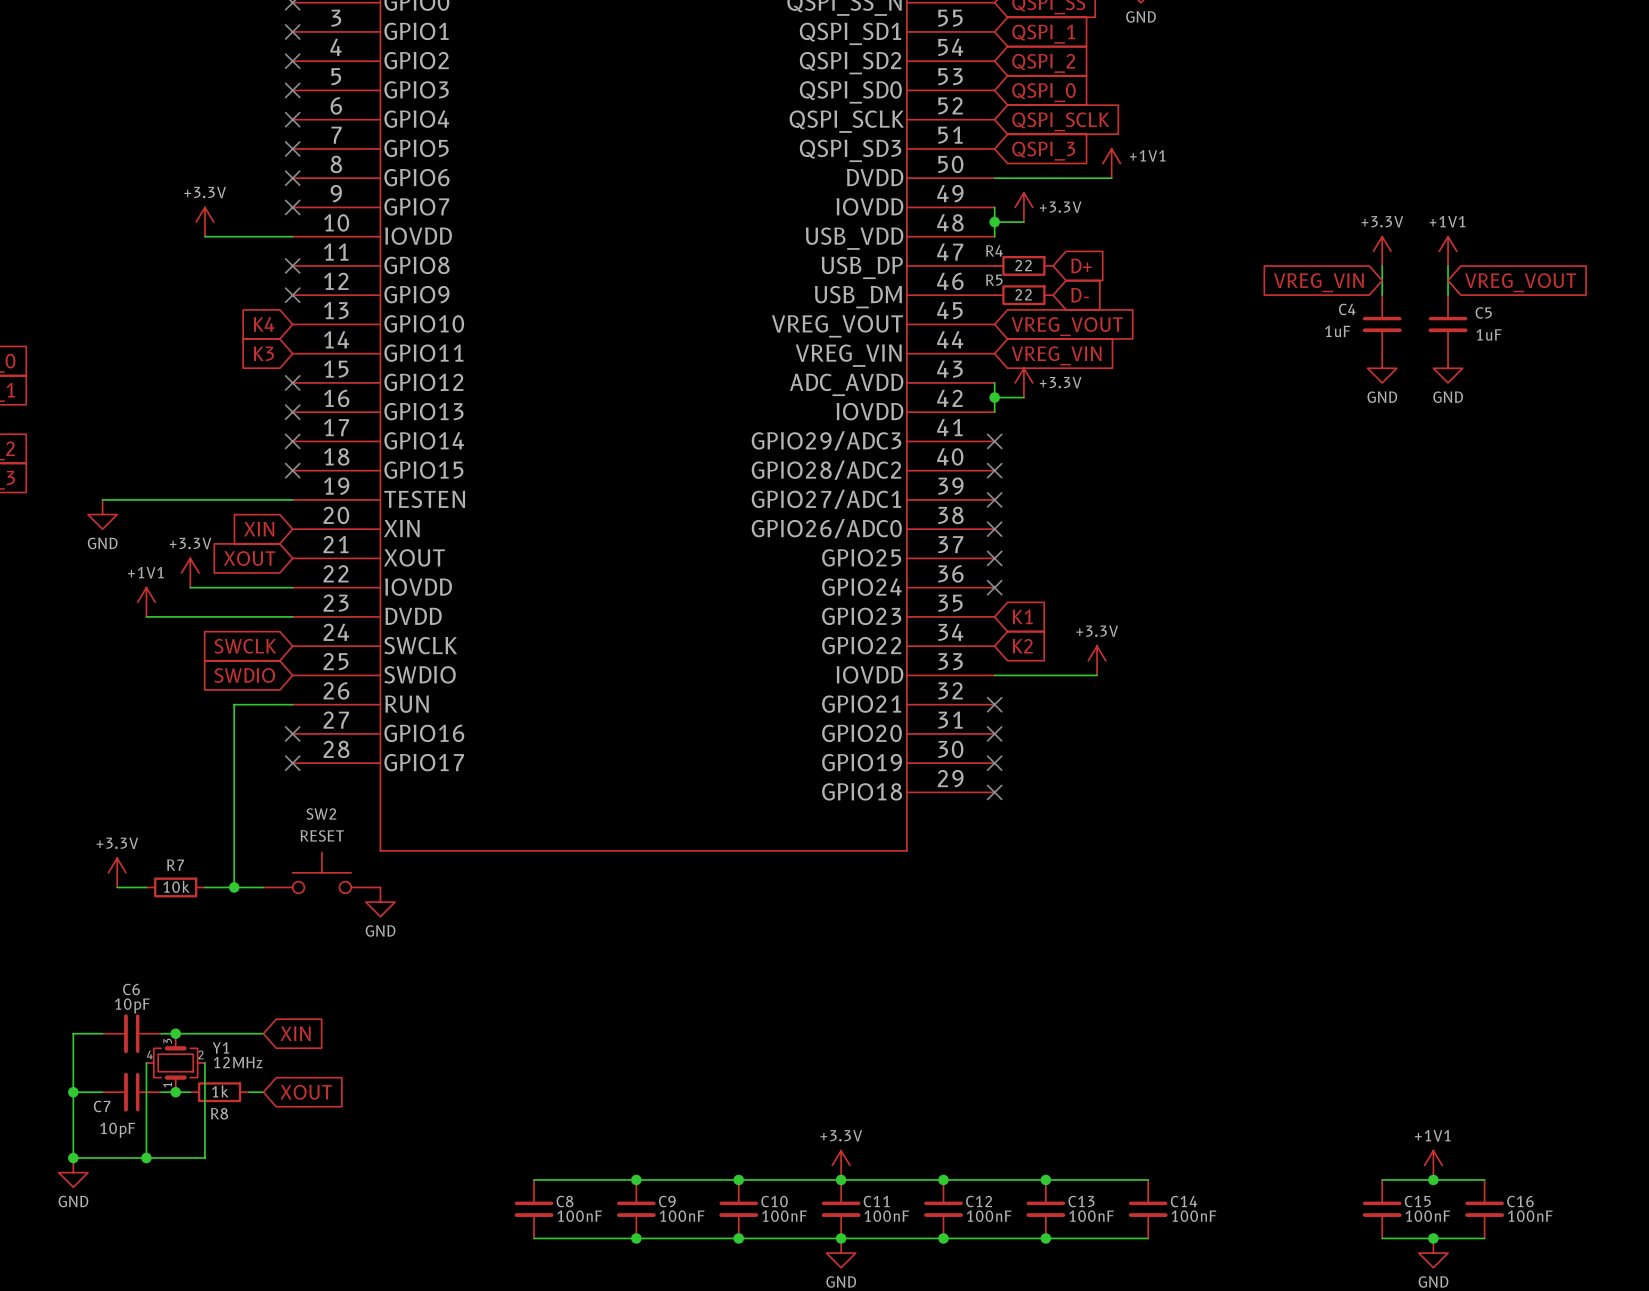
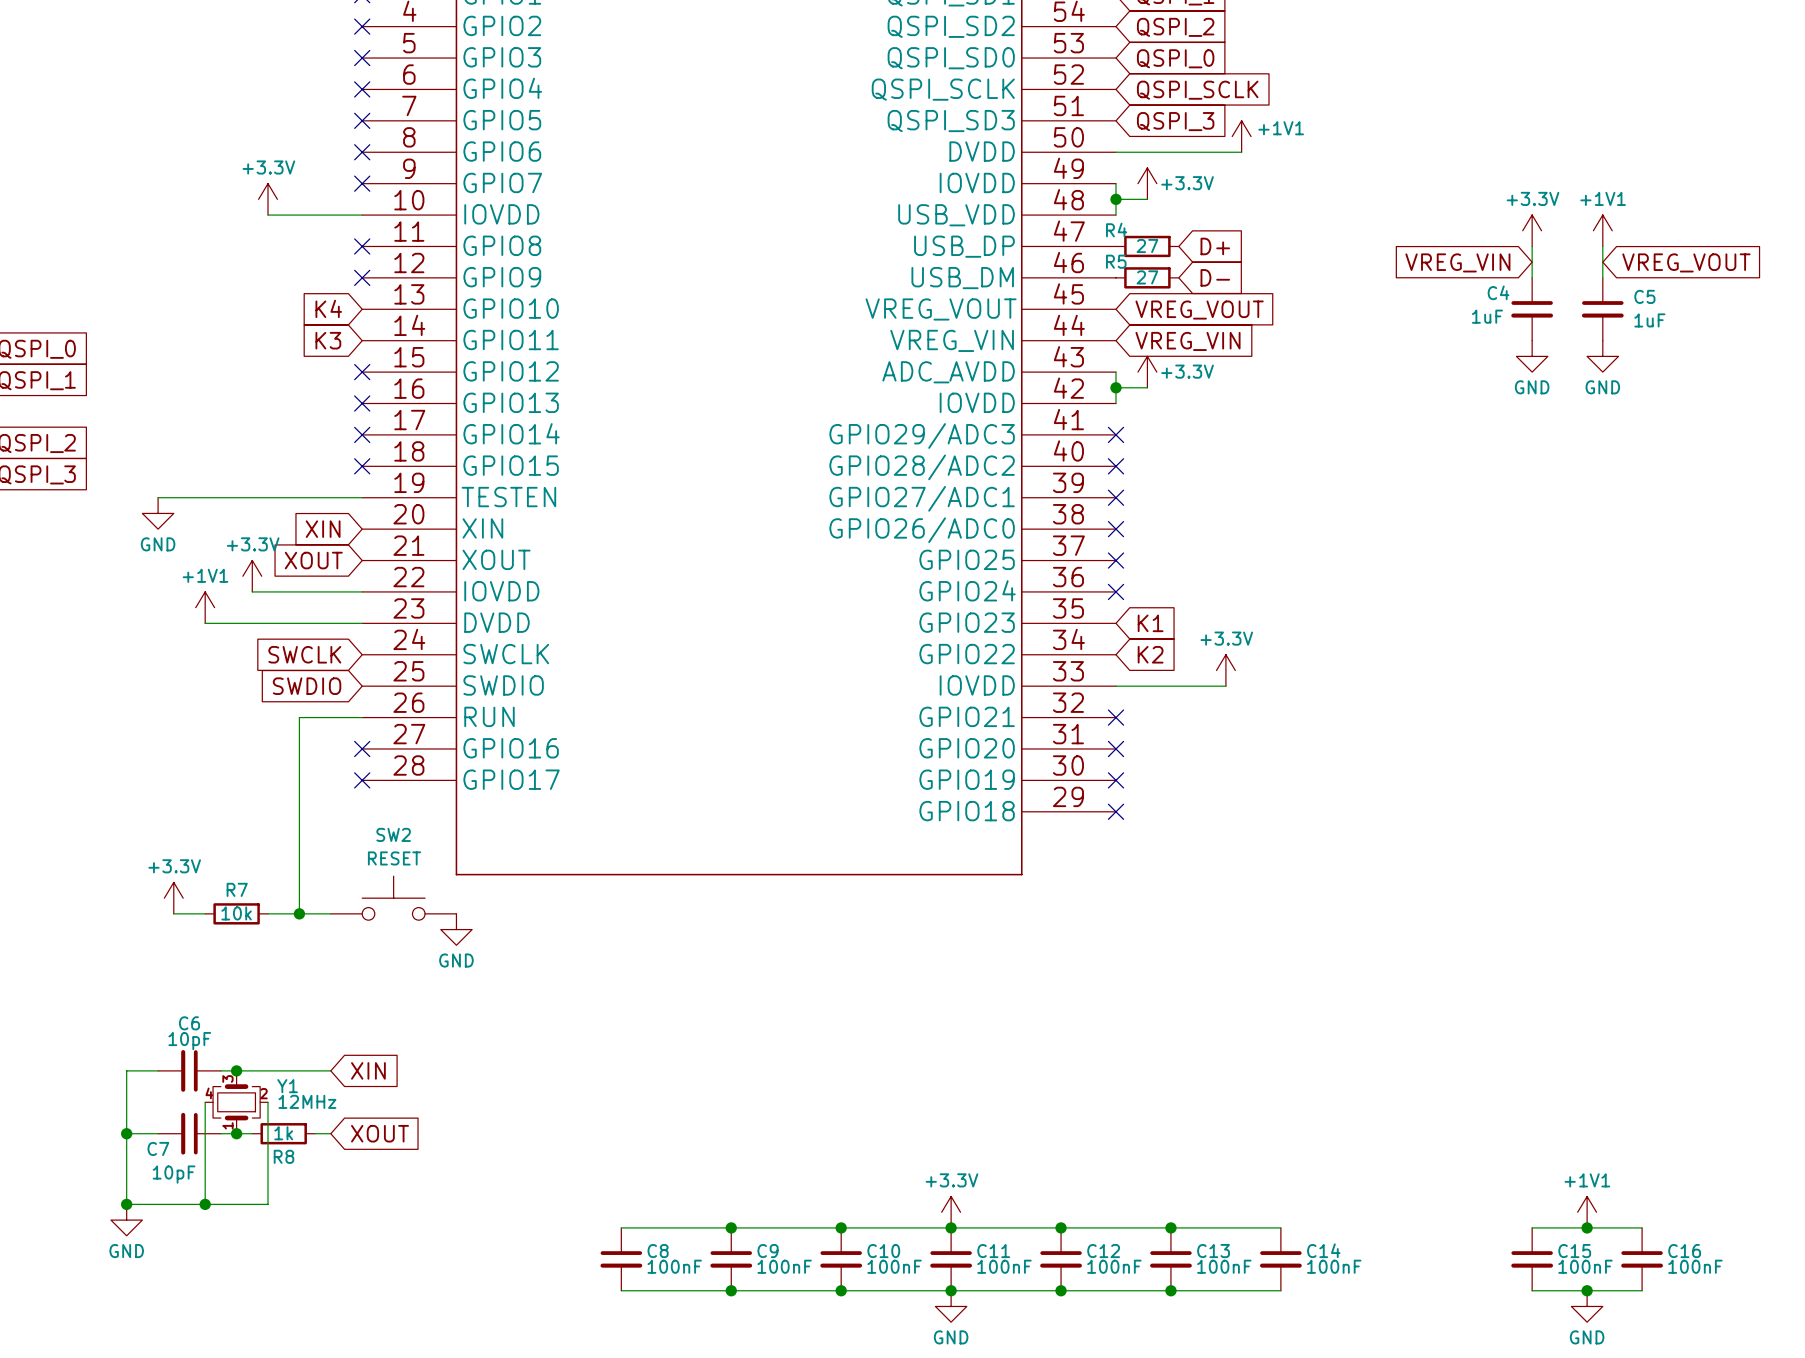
R4 value: 22 (1023, 265) -> 27 (1147, 246)
R5 value: 22 (1023, 294) -> 27 (1147, 277)

